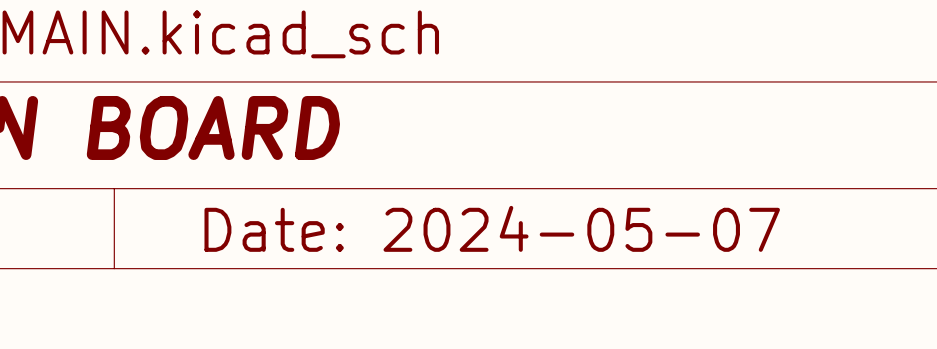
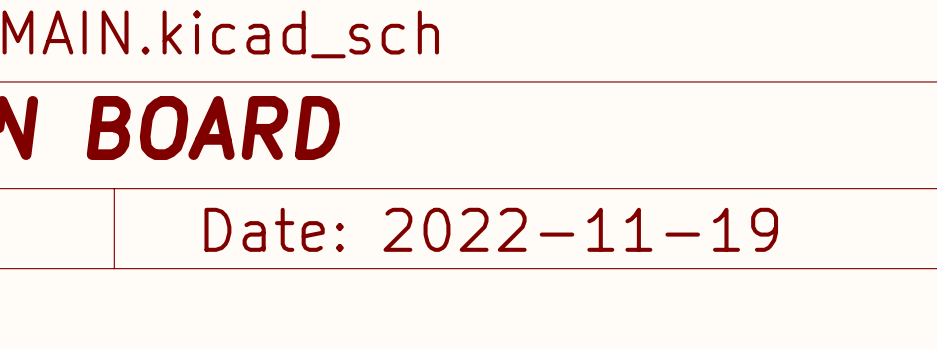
title block: Date: 2024-05-07 (492, 228) -> Date: 2022-11-19 (491, 229)

